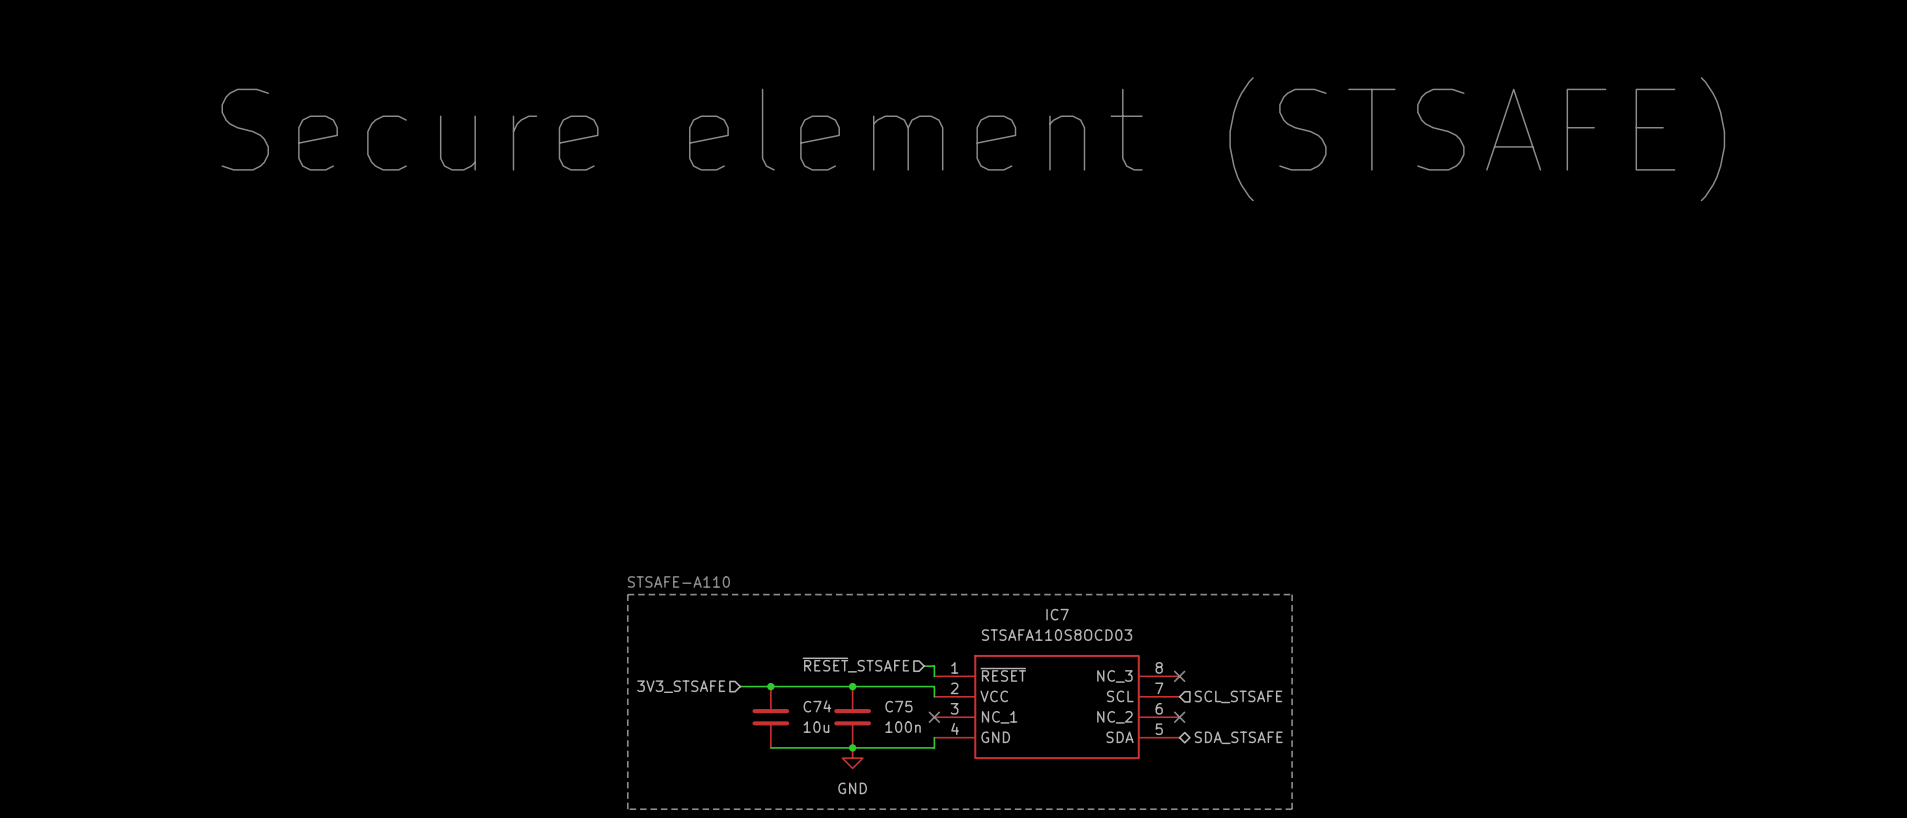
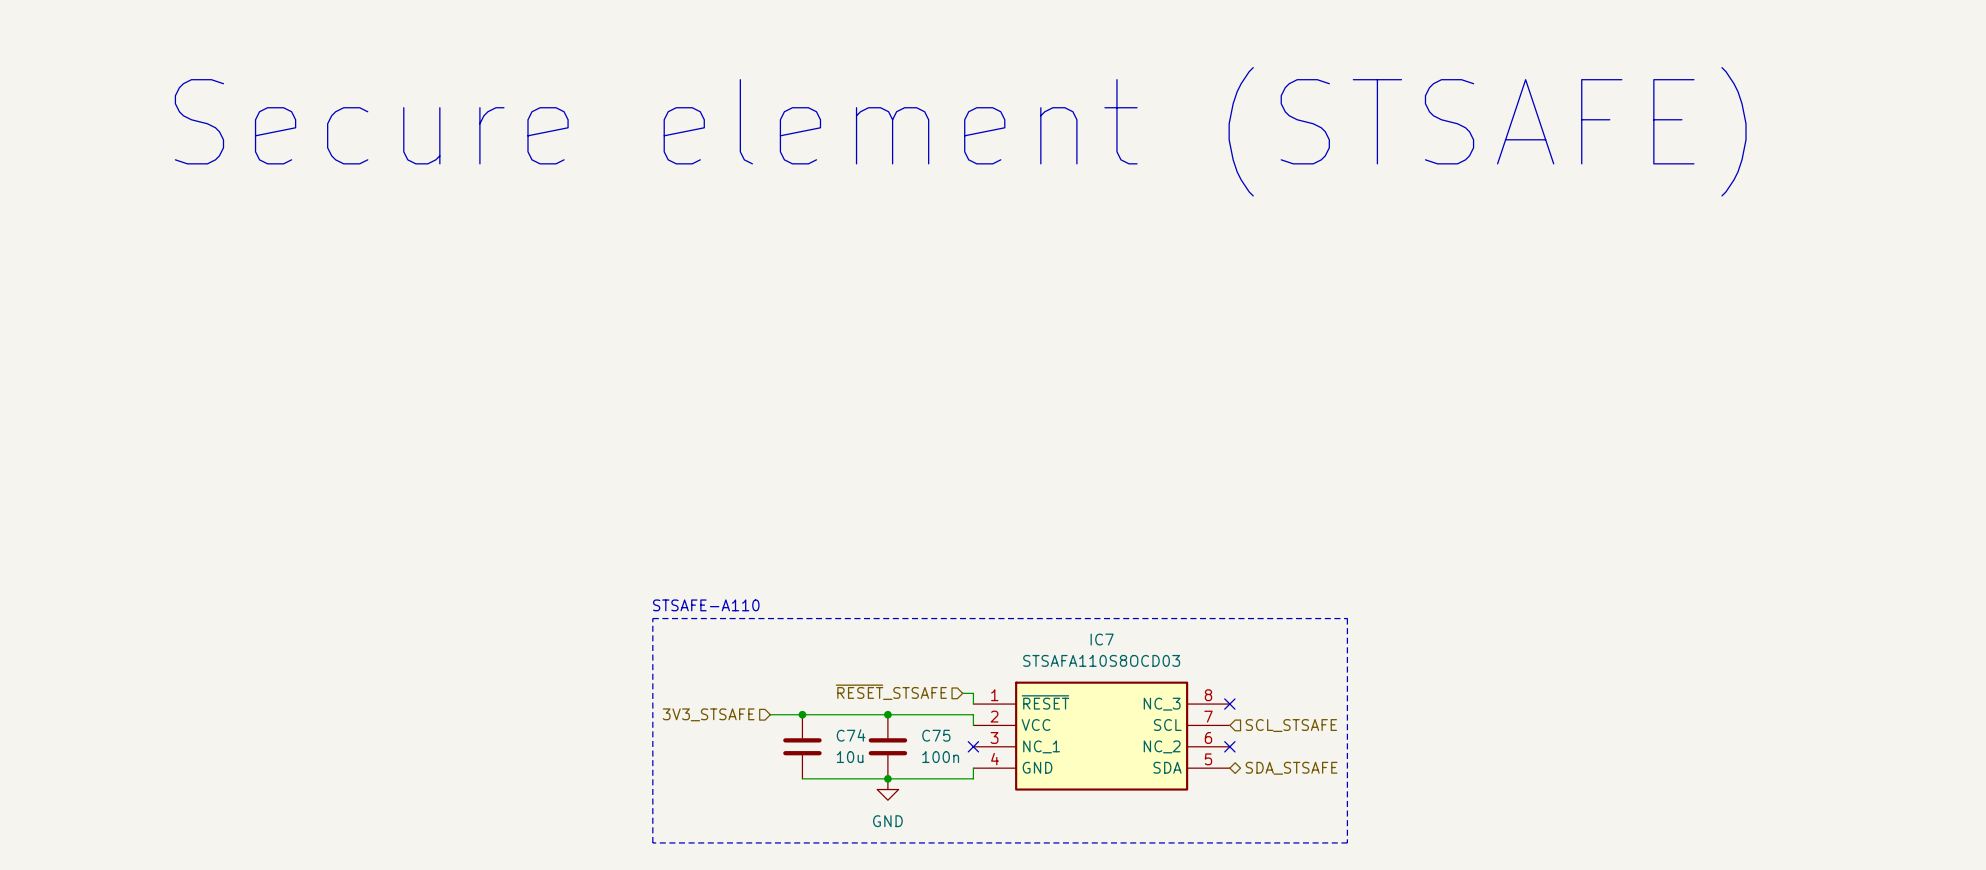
text position: Secure element (STSAFE) (973, 139) -> Secure element (STSAFE) (960, 131)

